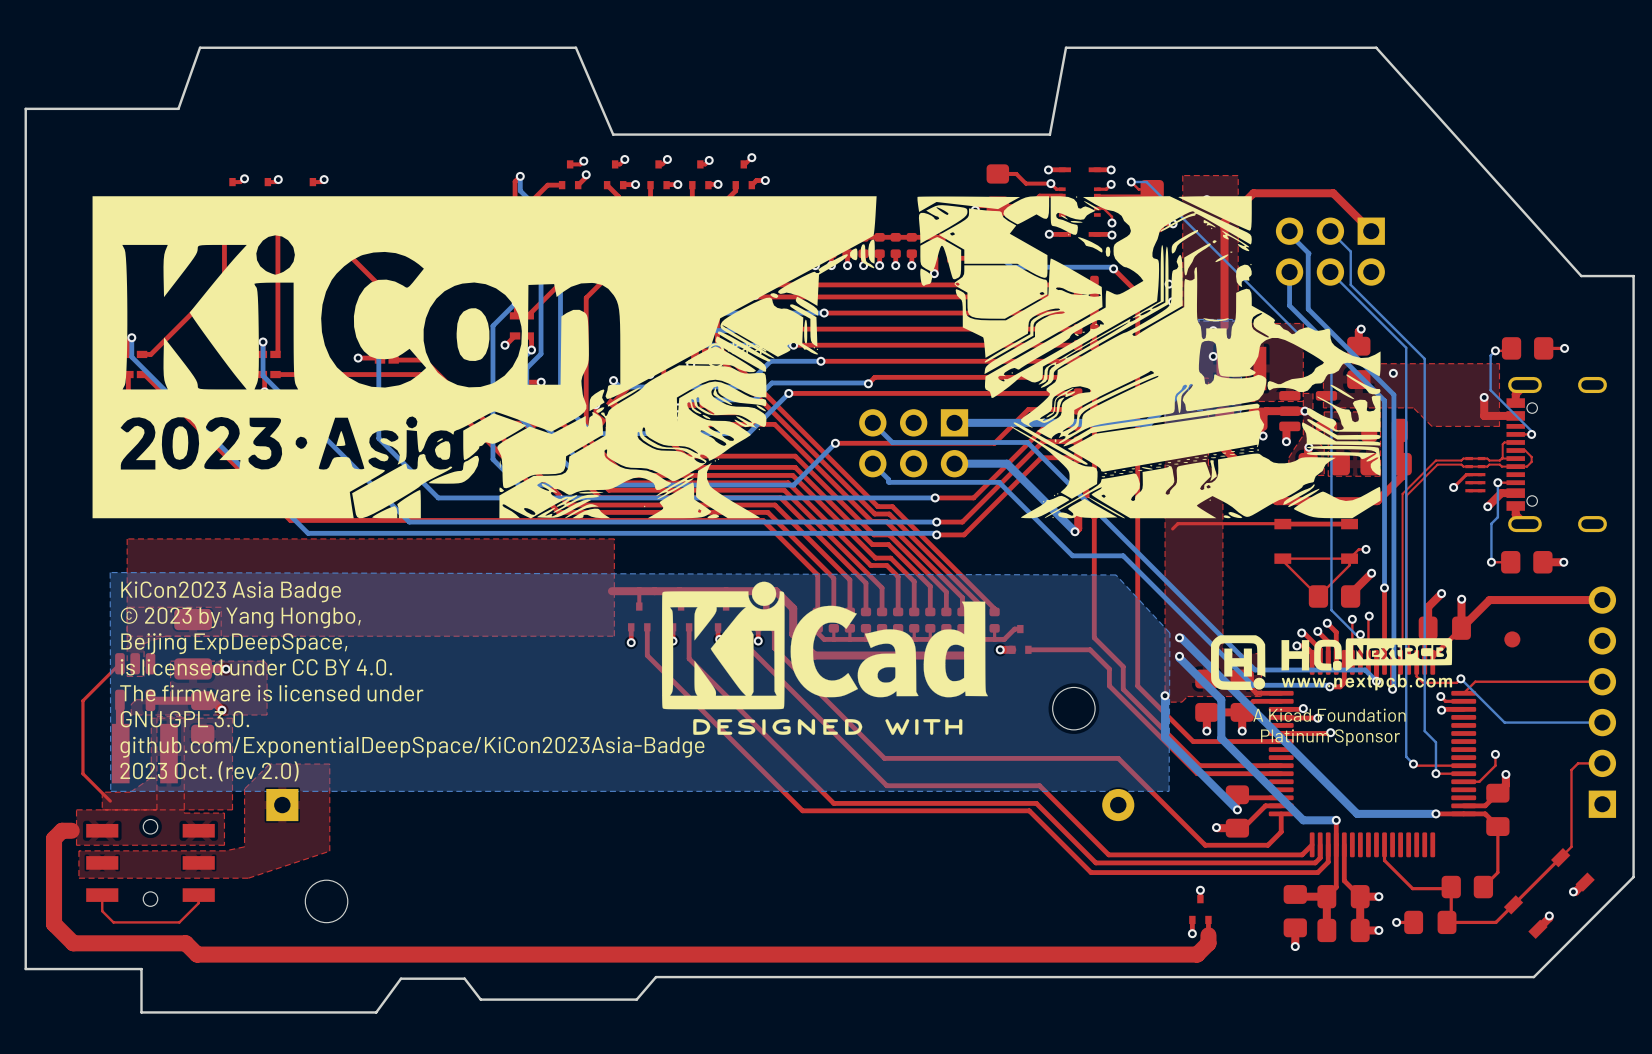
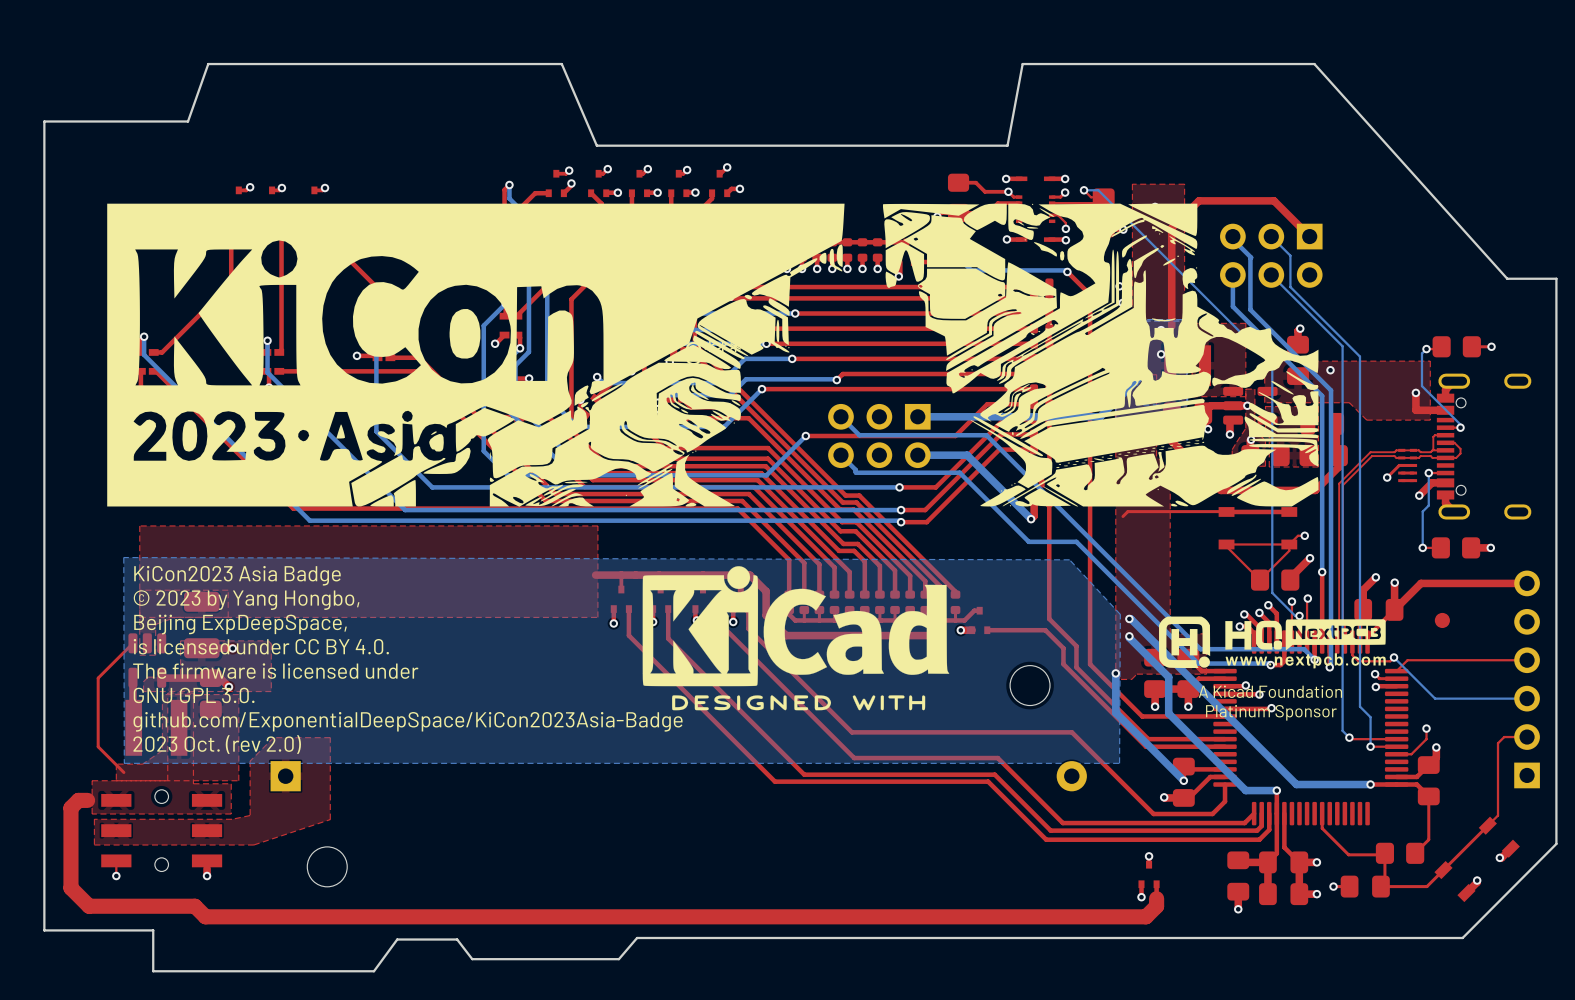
top track: (198, 903) (179, 922) (113, 922) (102, 911) -> (207, 868) (207, 876)
via: none -> (116, 876)
via: none -> (207, 876)

